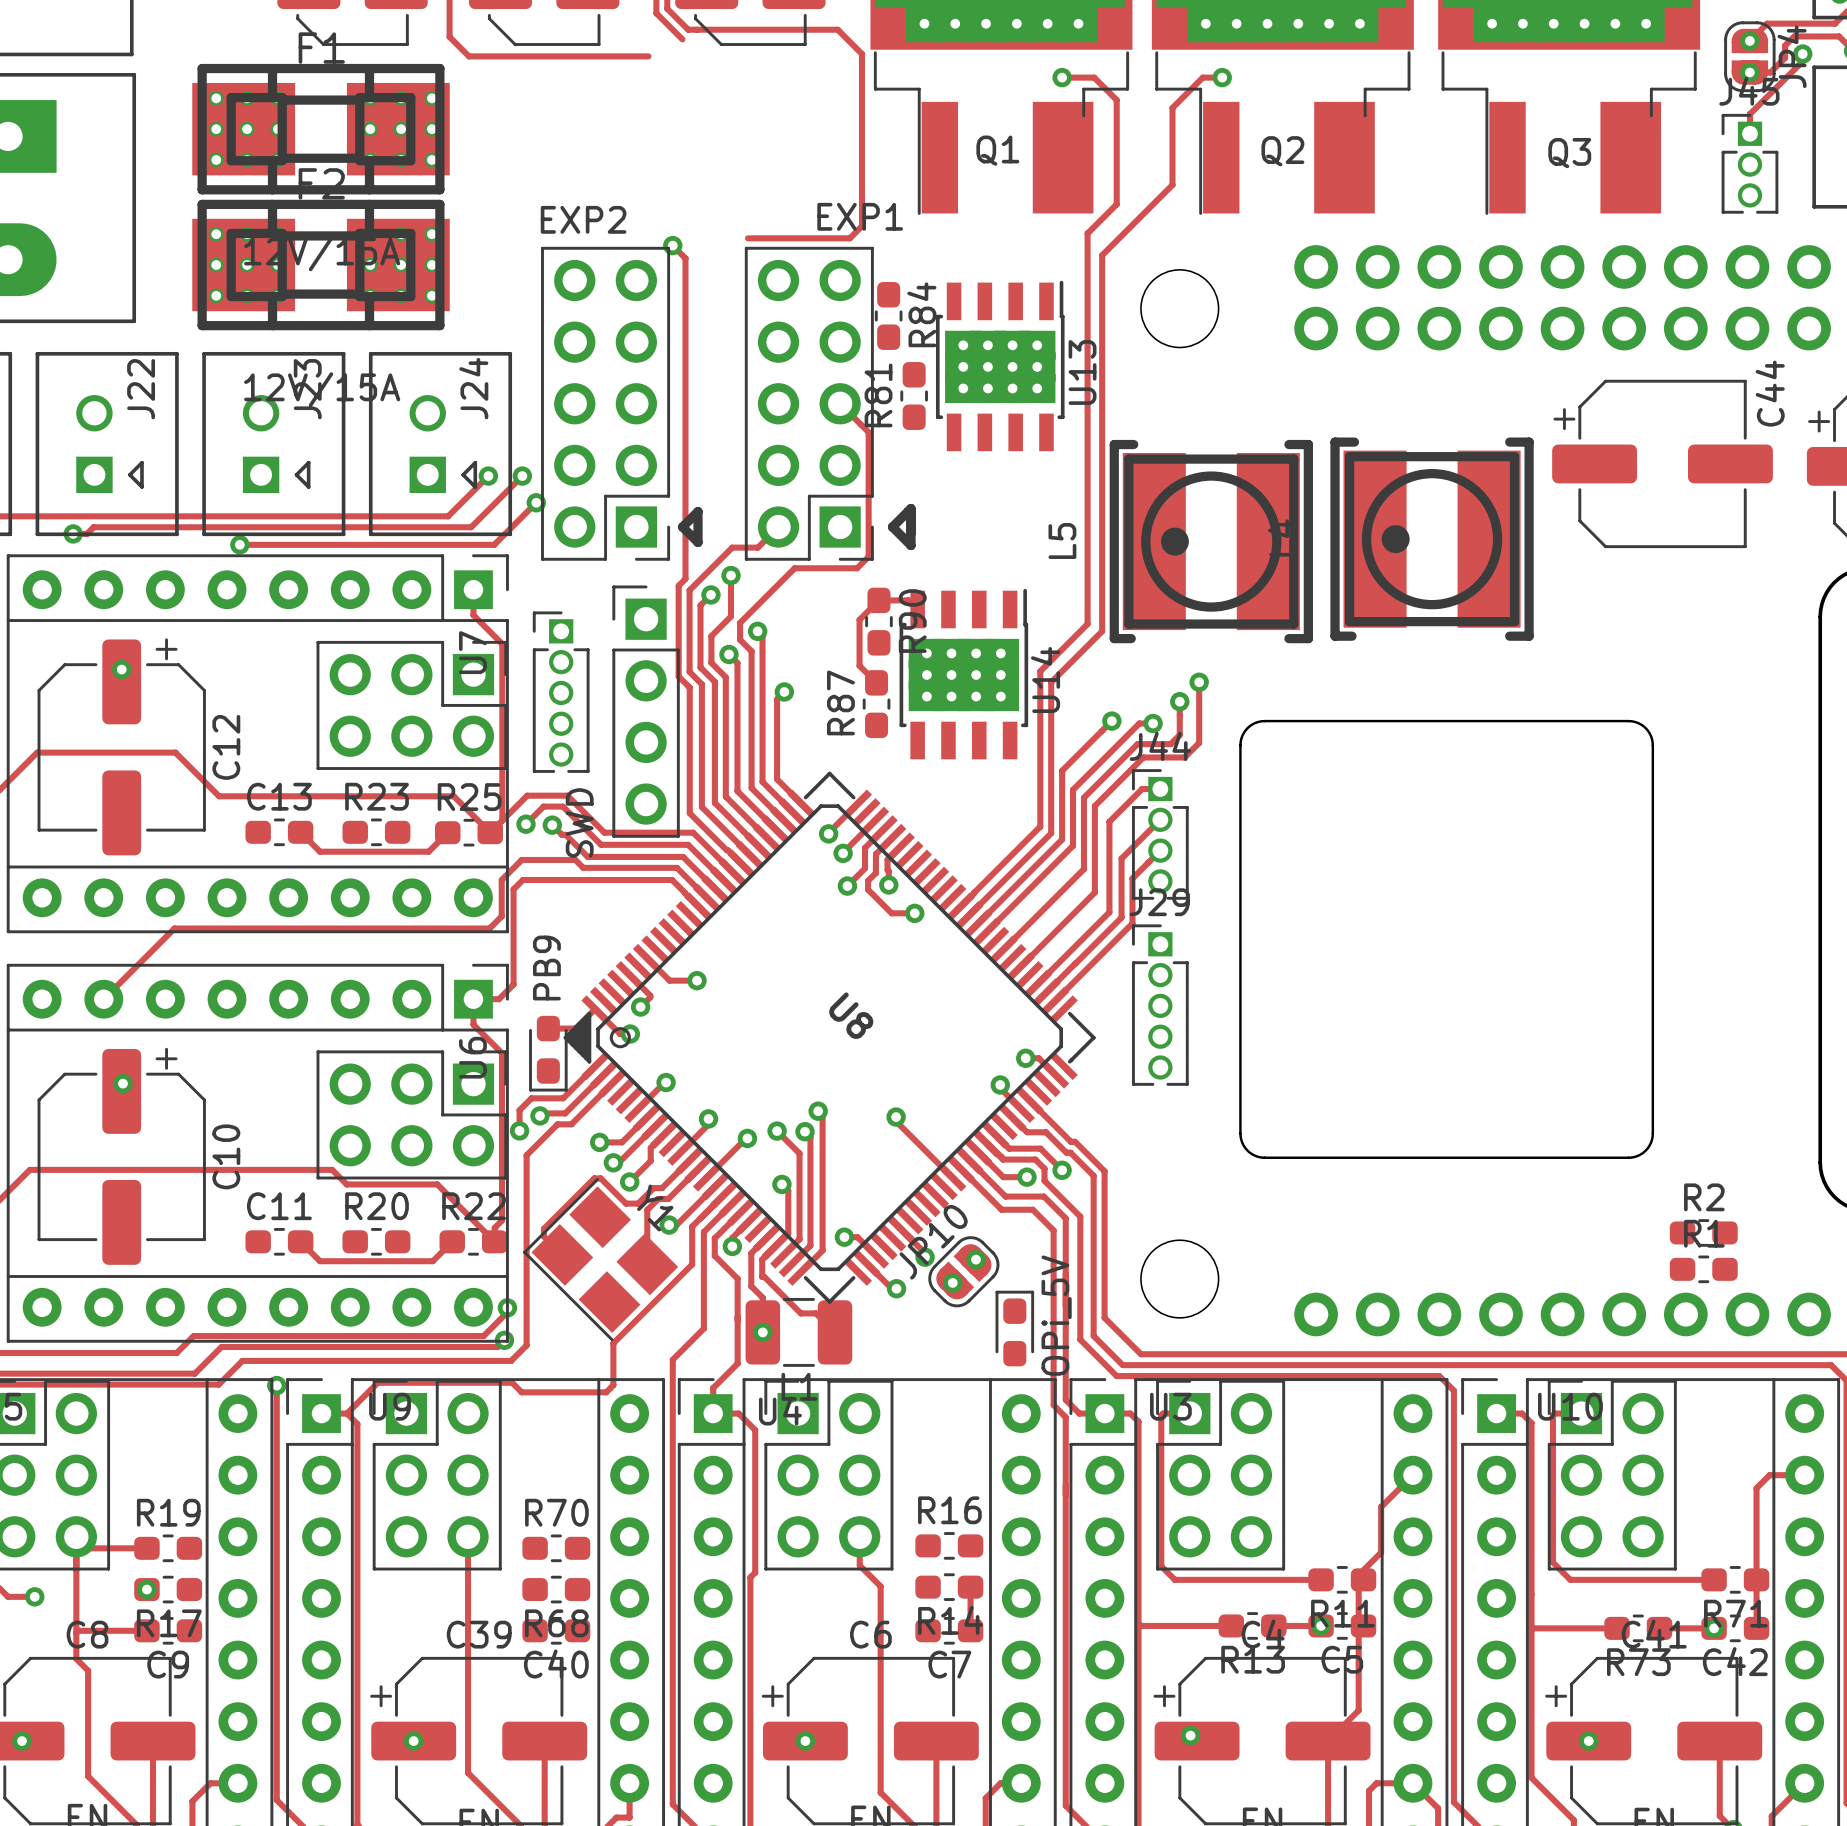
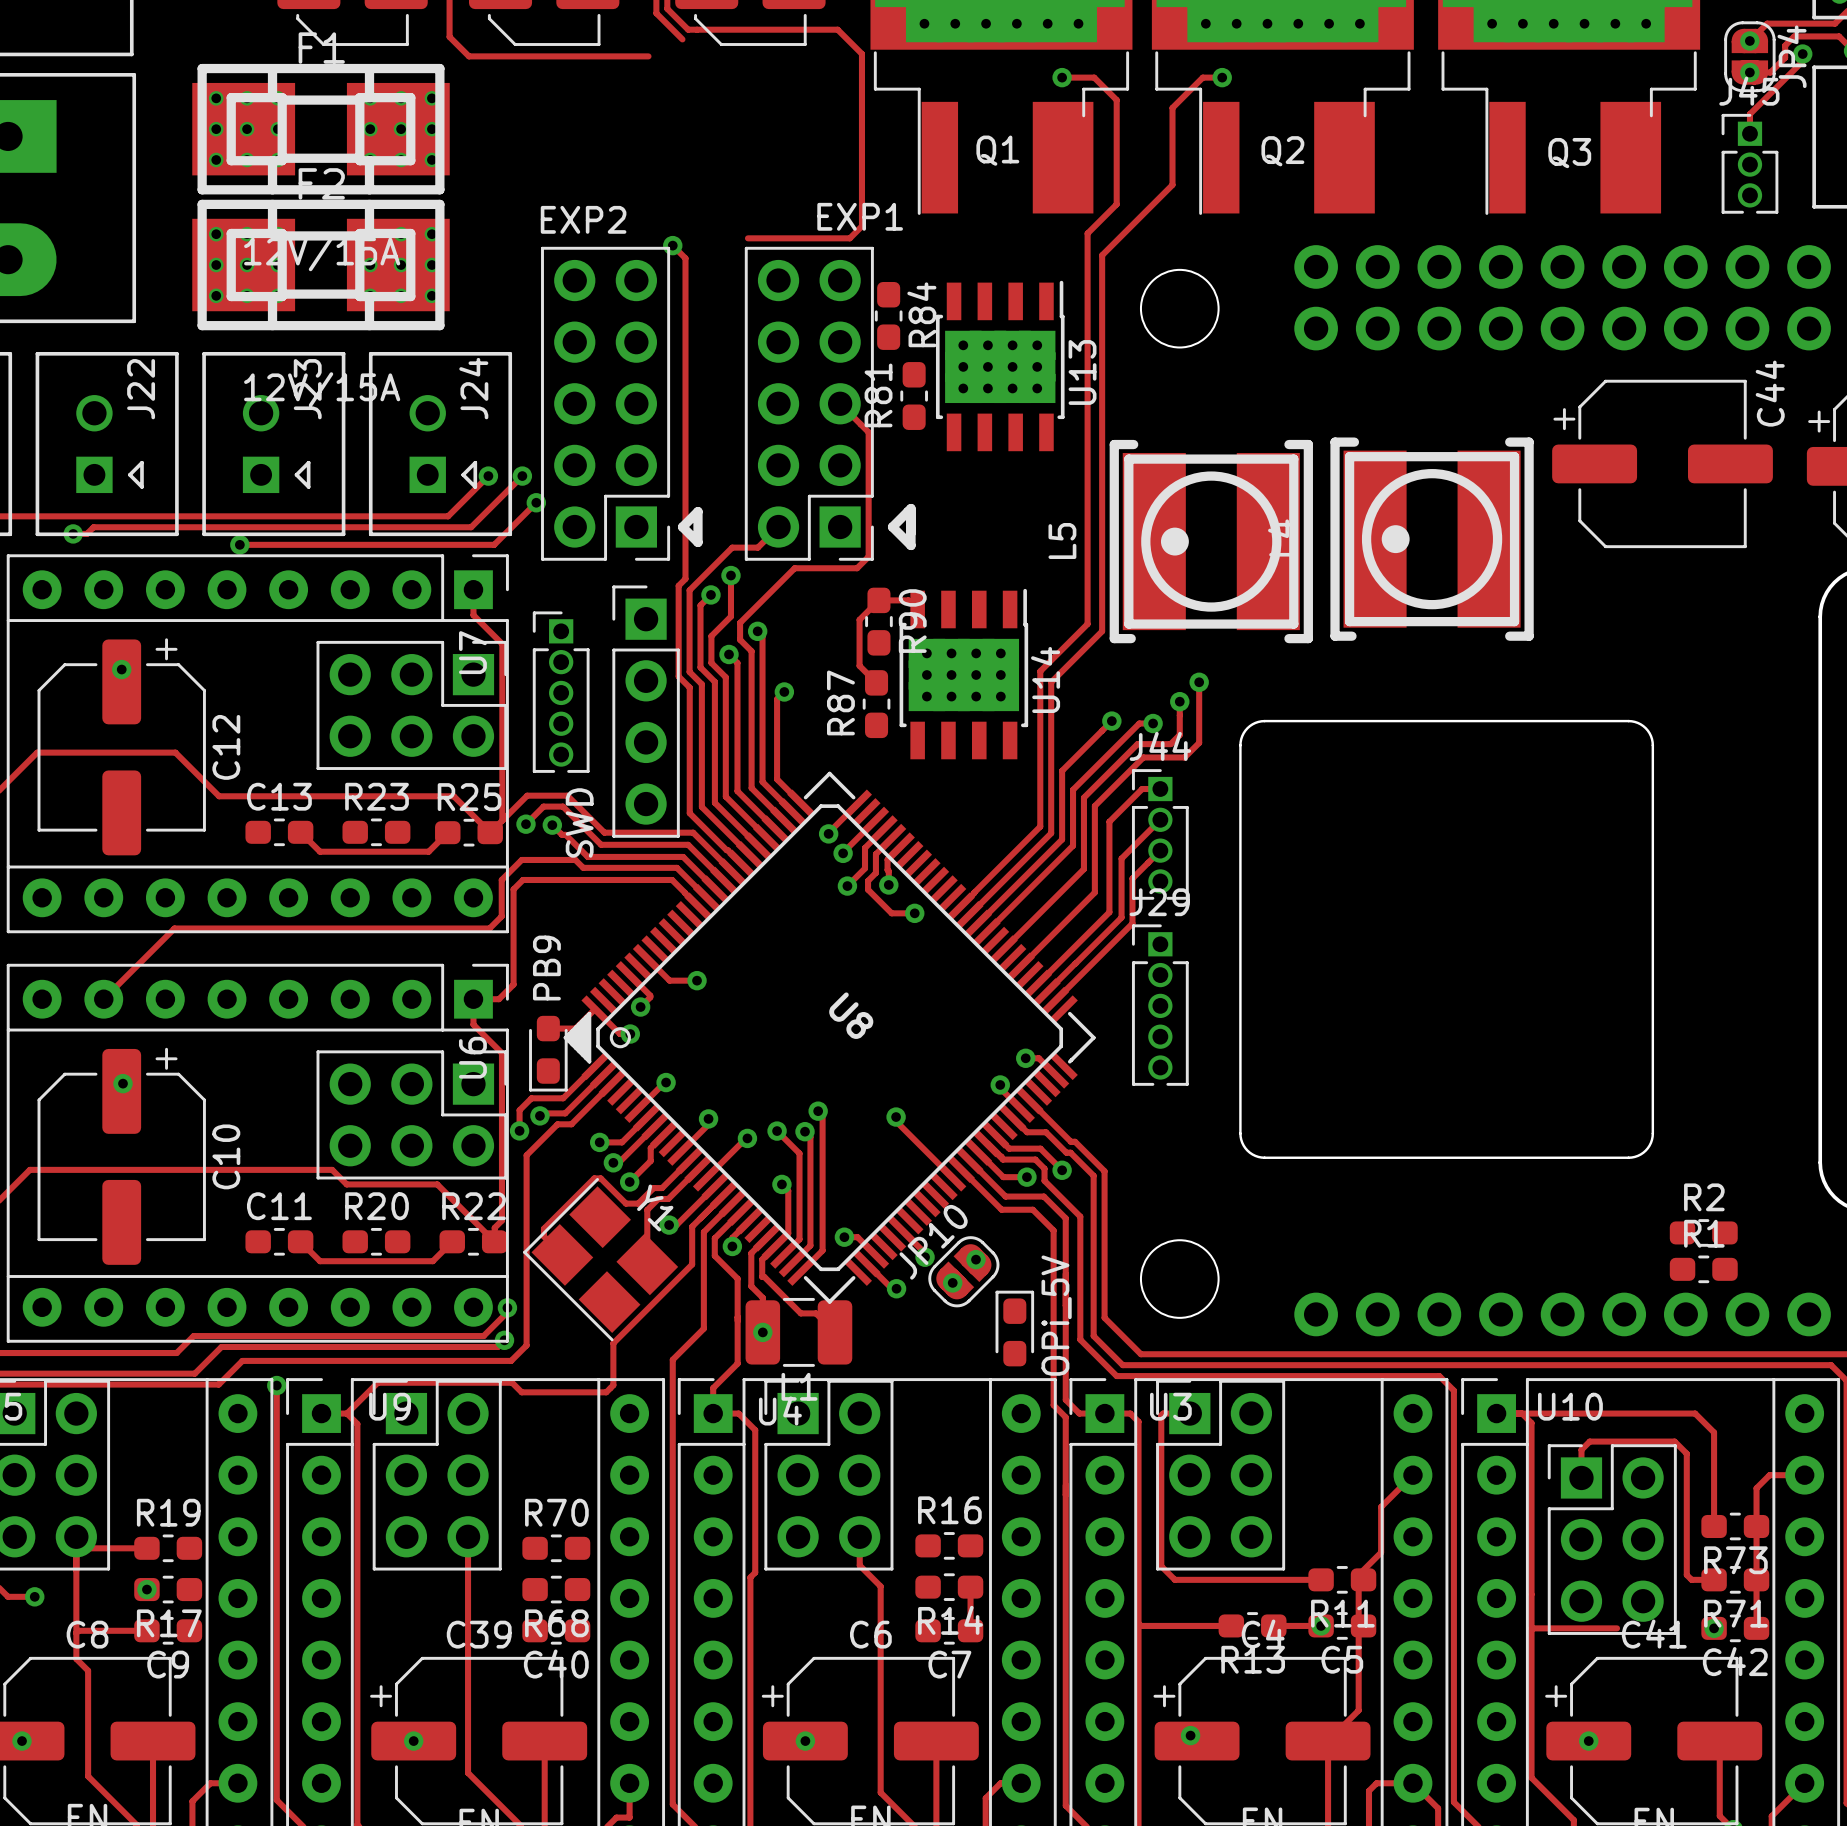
track: none -> (1522, 1413) (1554, 1413)
track: (1554, 1413) (1552, 1415) (1552, 1562) (1570, 1579) (1691, 1579) -> (1581, 1477) (1581, 1449) (1589, 1441) (1674, 1441) (1686, 1453) (1686, 1575) (1691, 1579)
track: none -> (1581, 1413) (1695, 1413) (1714, 1432) (1714, 1526)
part position: (1612, 1475) -> (1612, 1539)
R73 position: (1638, 1628) -> (1735, 1526)
track: (1659, 1628) (1714, 1628) -> none

